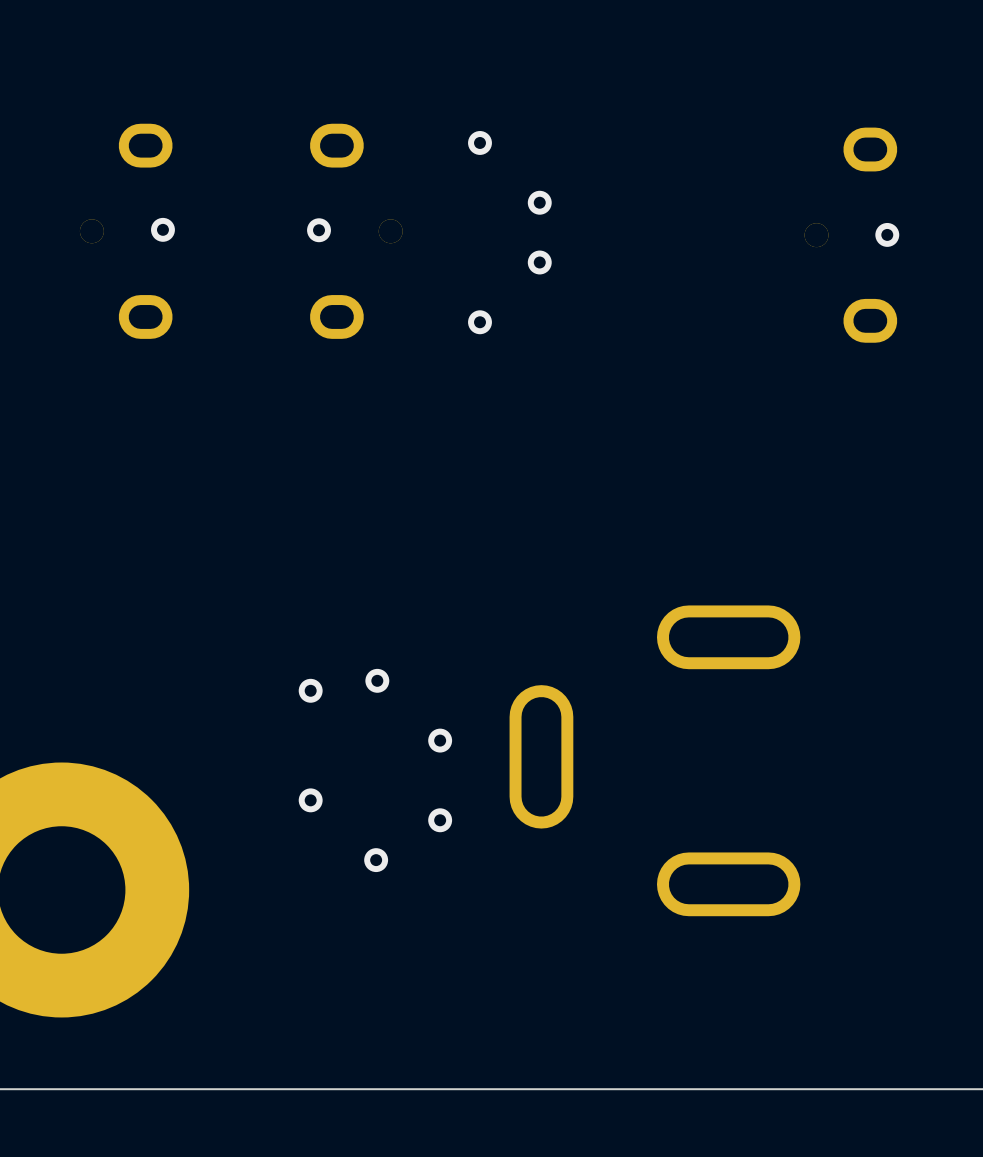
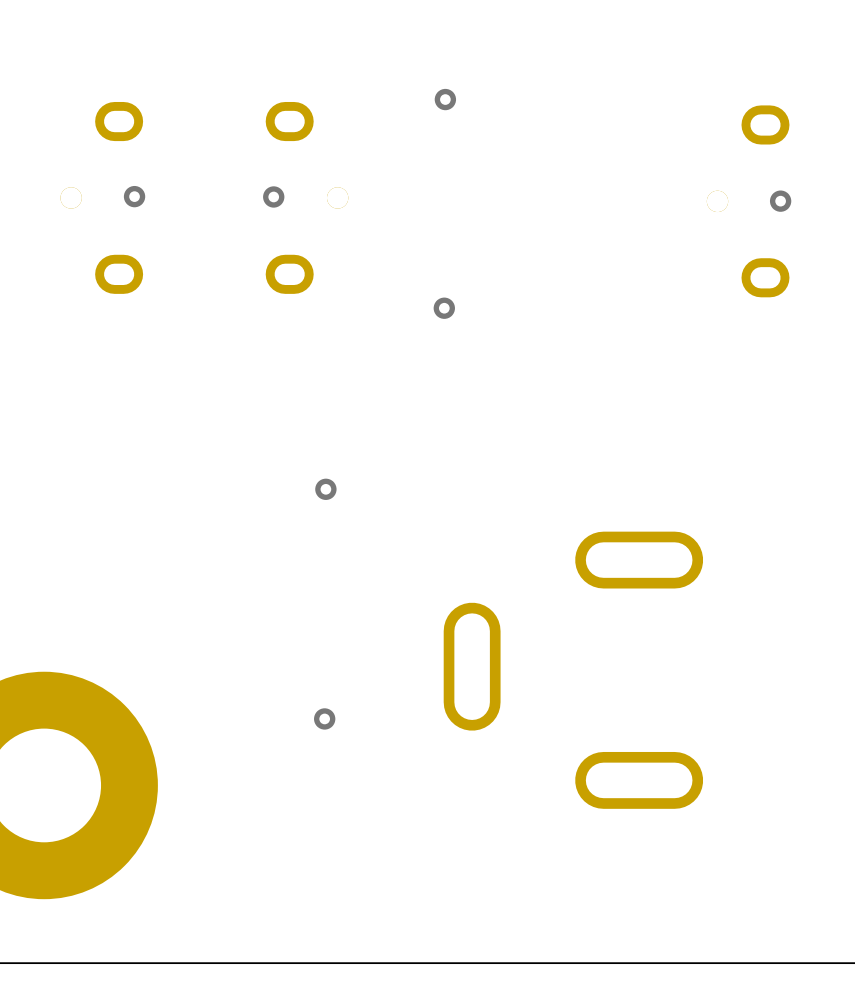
via position: (479, 142) -> (445, 99)
via: (539, 202) -> none
via: (539, 262) -> none
via position: (479, 322) -> (444, 308)
via: none -> (325, 489)
via: (377, 680) -> none
via: (310, 690) -> none
via: (440, 740) -> none
via: (310, 800) -> none
via: none -> (324, 718)
via: (440, 820) -> none
via: (376, 860) -> none

